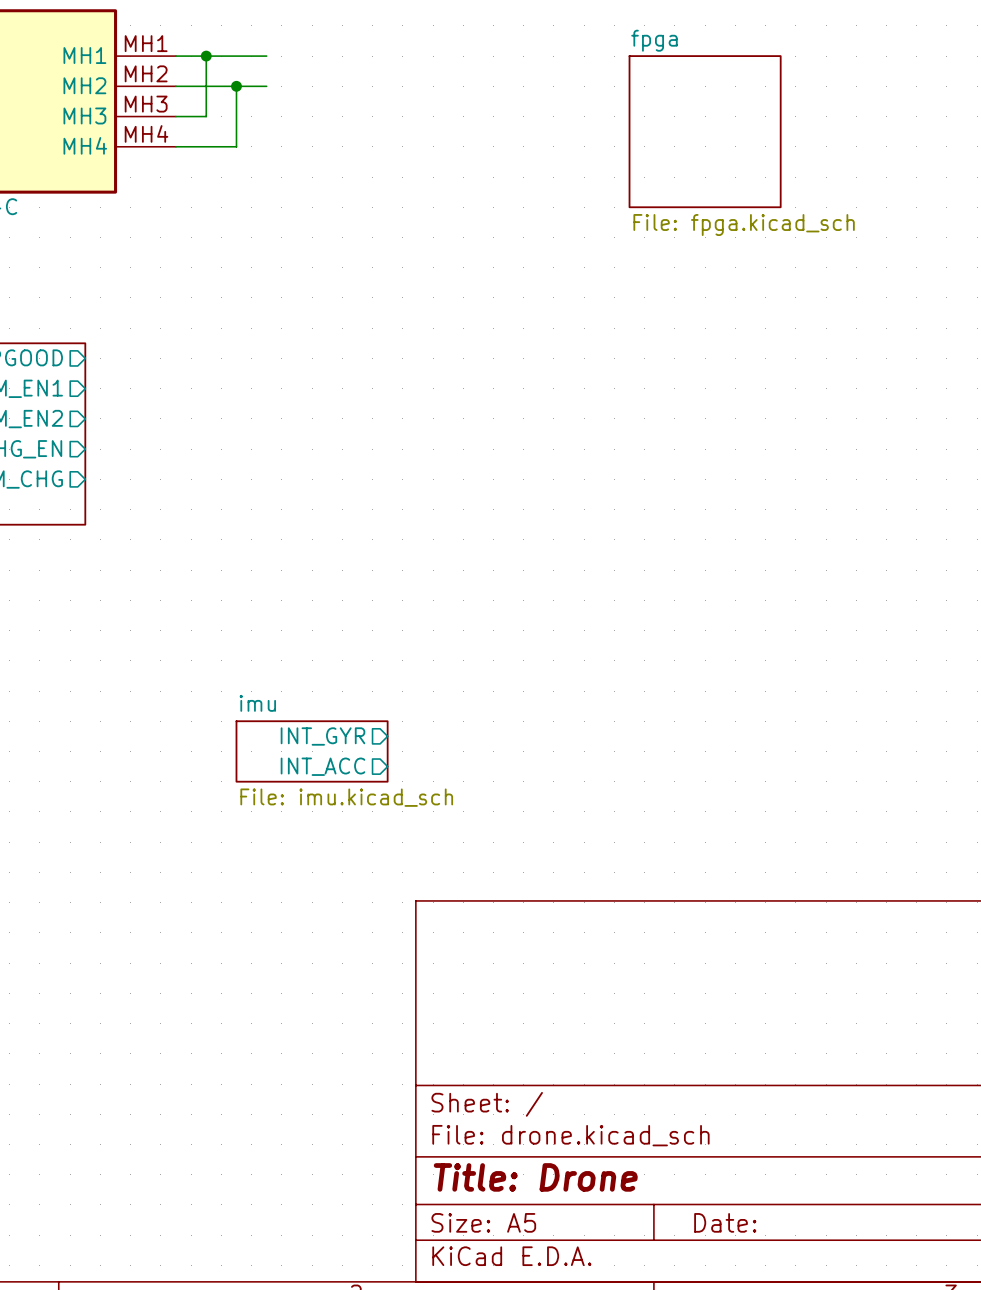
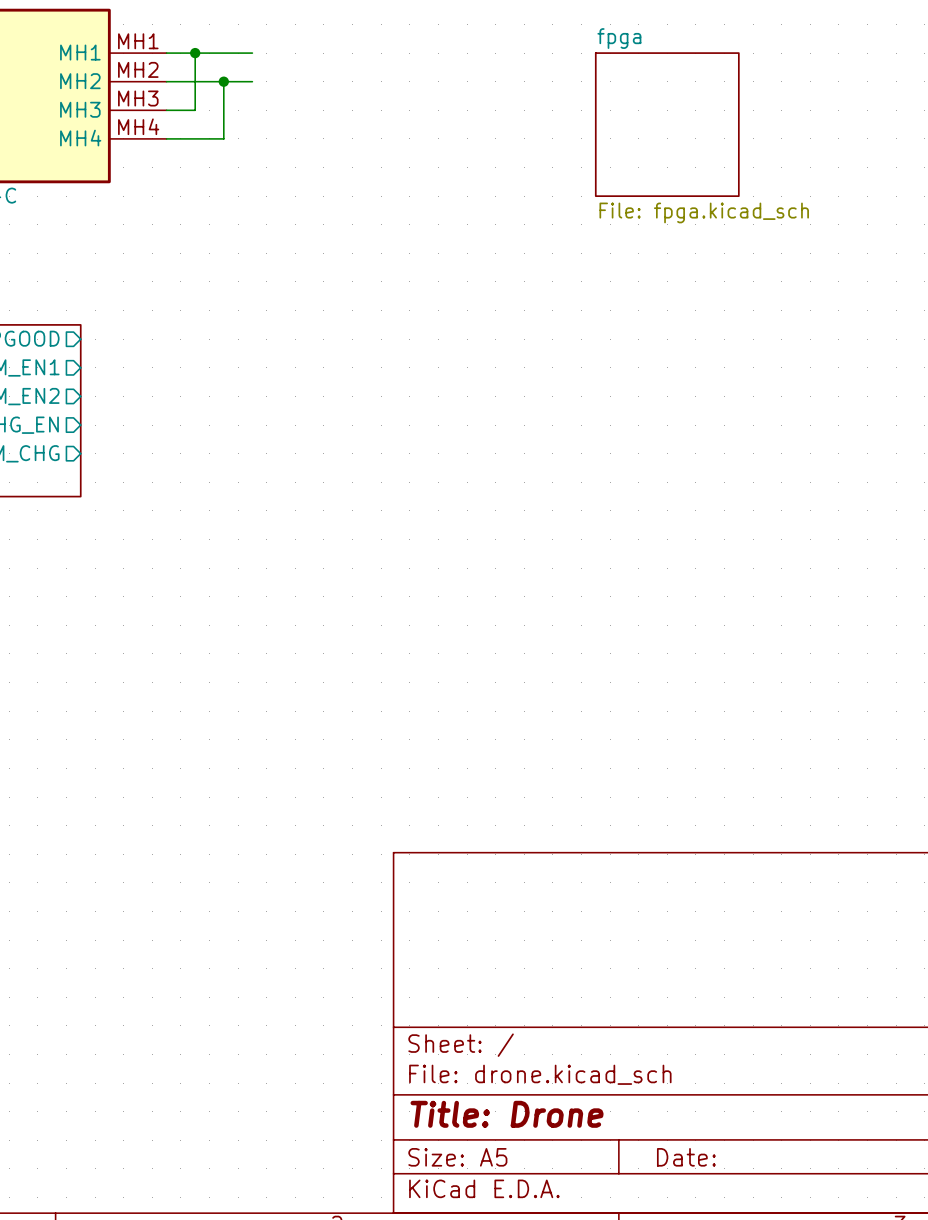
sheet pin: INT_GYR (322, 736) -> none
sheet imu: File: imu.kicad_sch (312, 751) -> none
sheet pin: INT_ACC (322, 766) -> none

